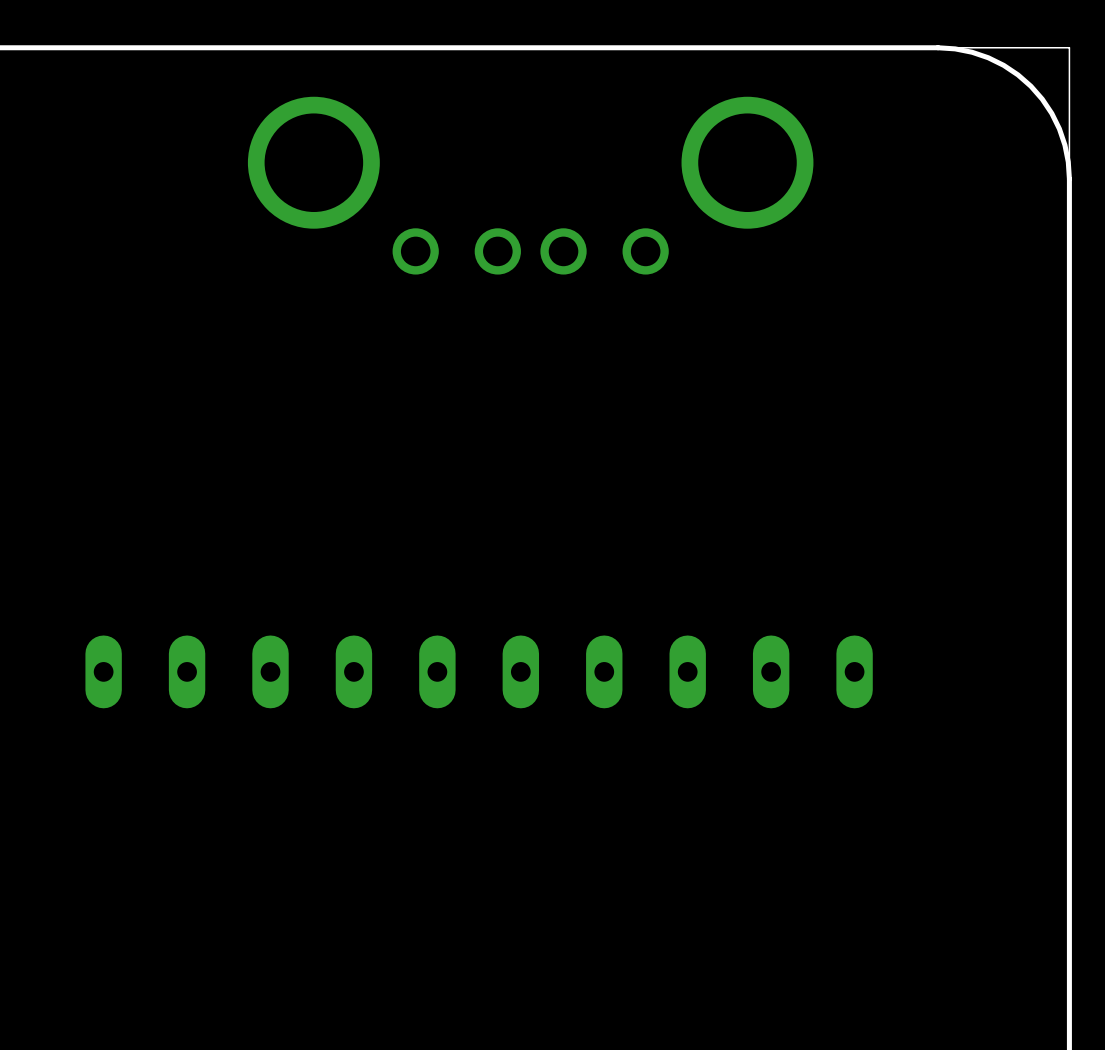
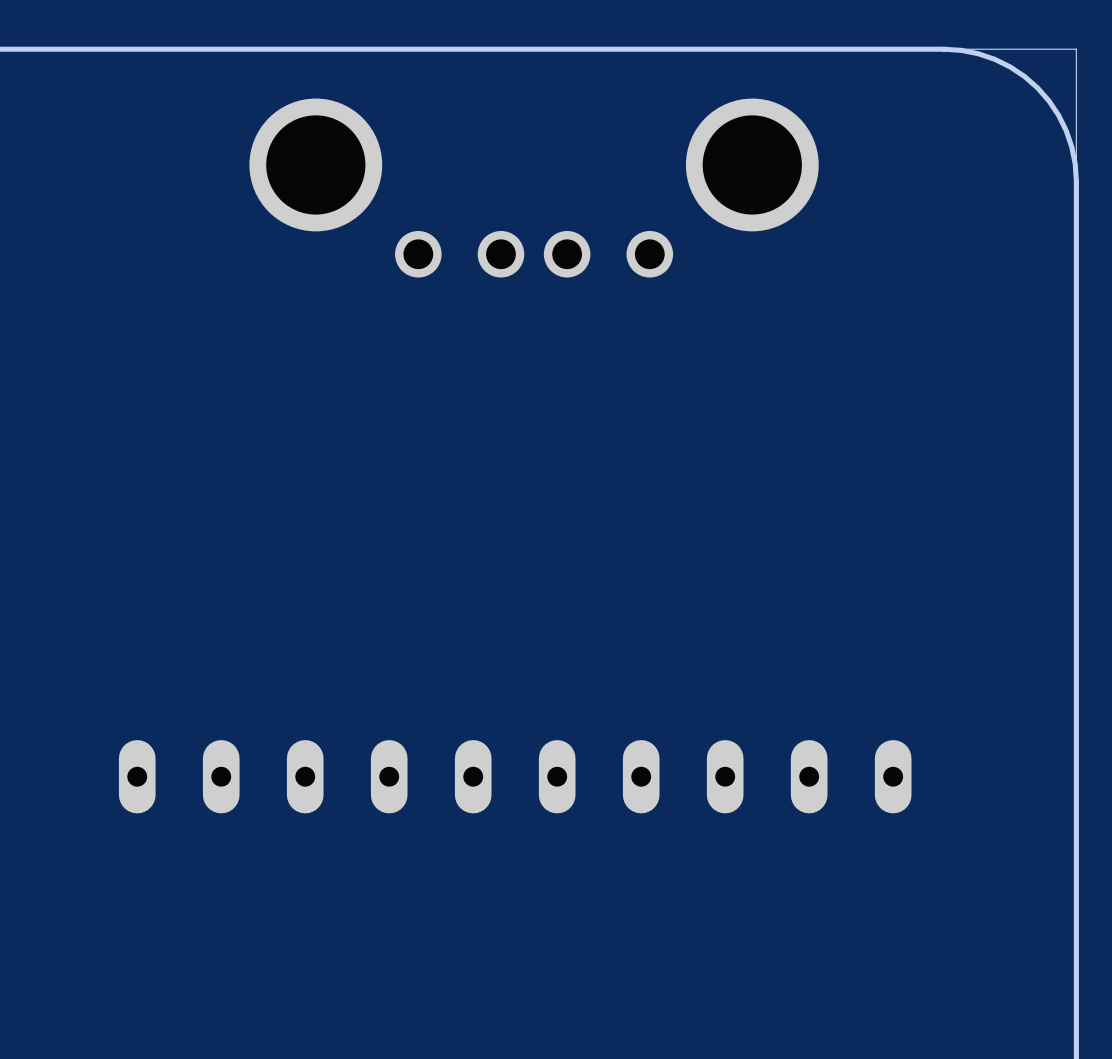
part position: (479, 671) -> (515, 776)

